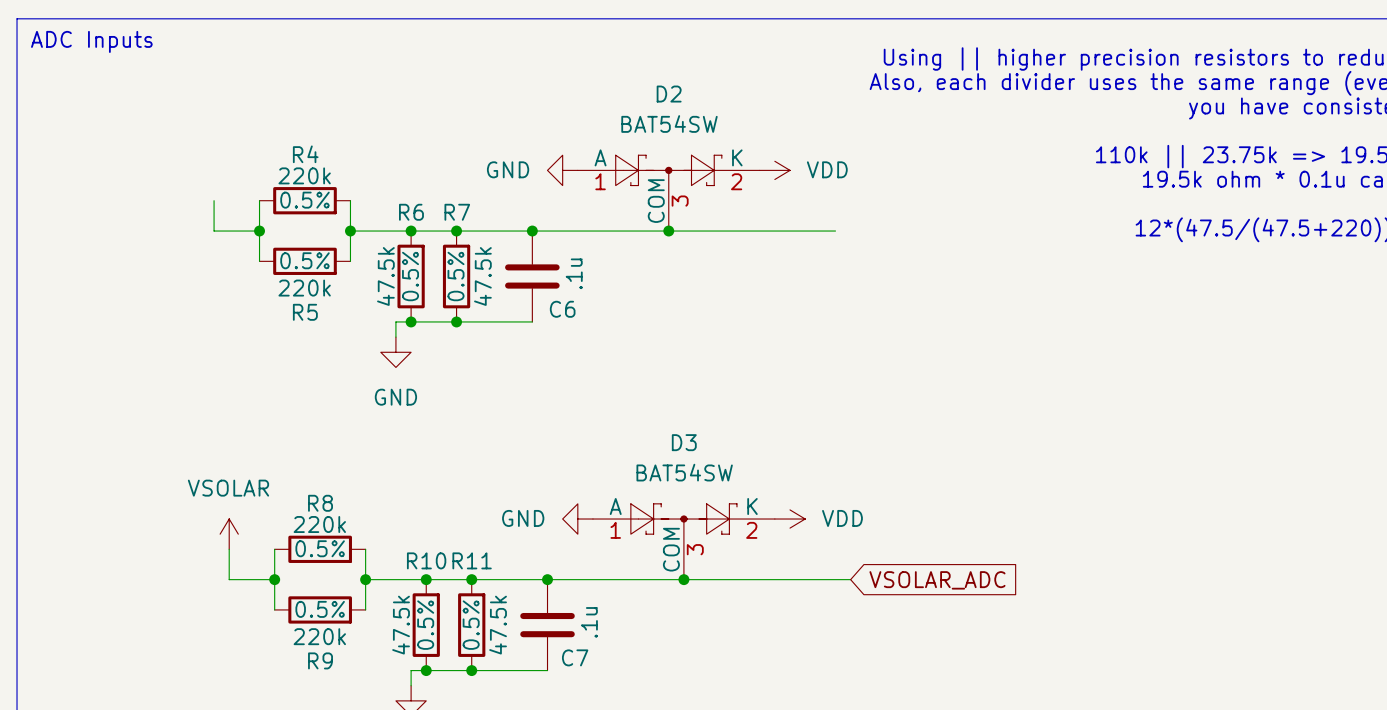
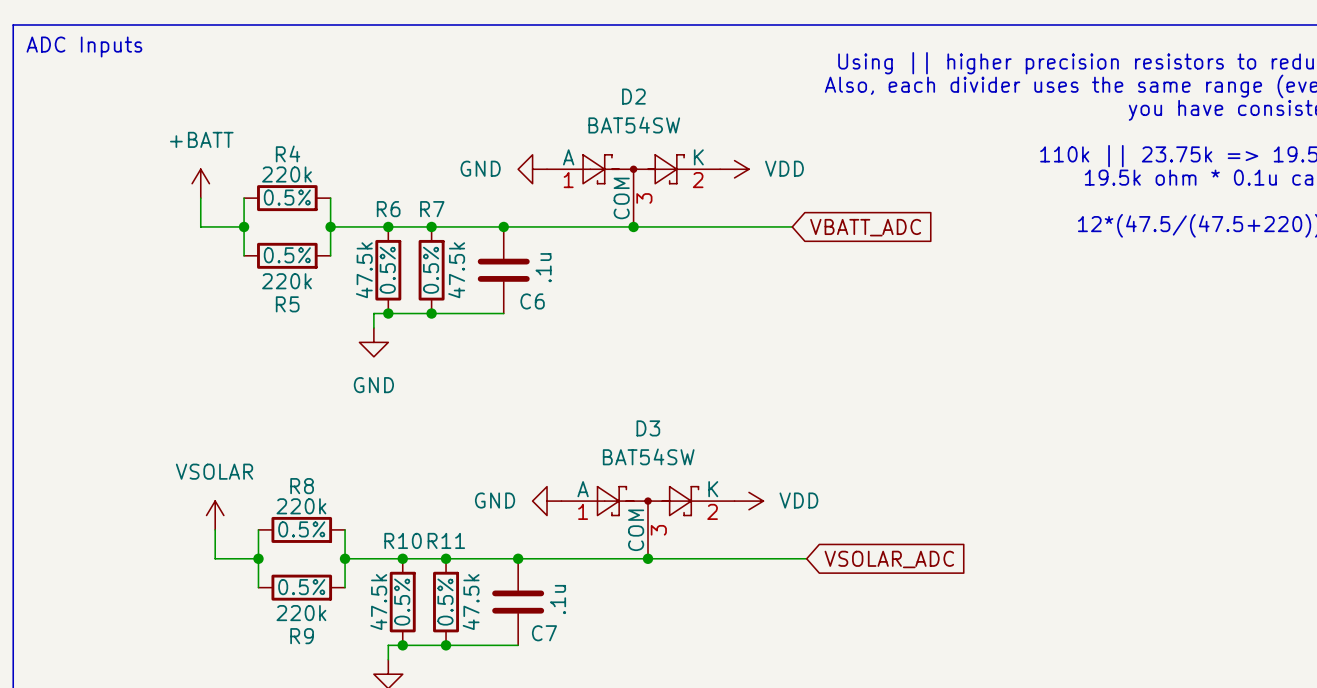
power symbol: none -> +BATT (200, 183)
global label: none -> VBATT_ADC (865, 227)

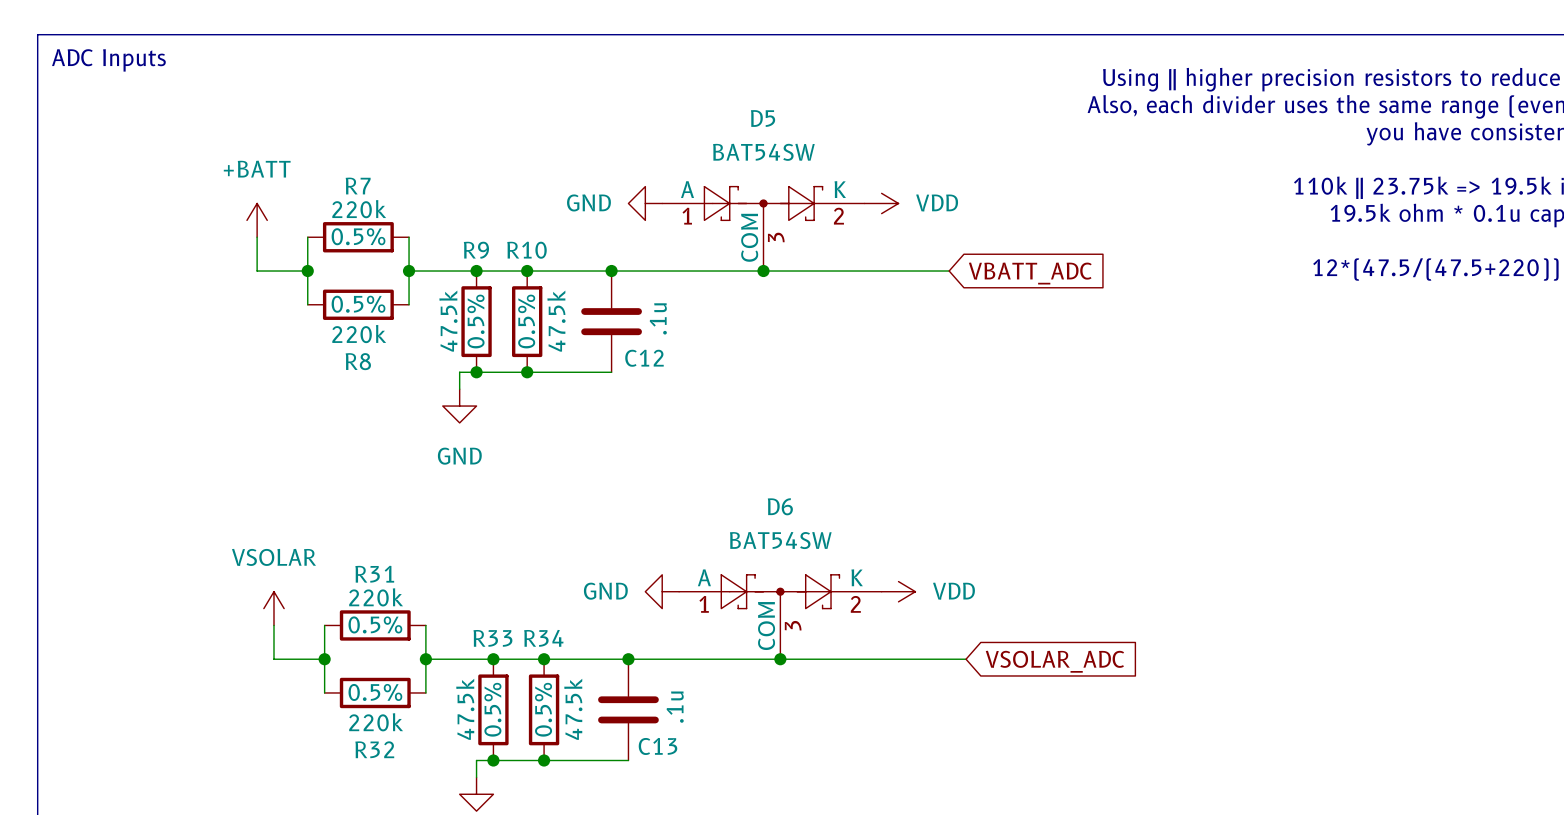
D2 name: D2 (633, 96) -> D5 (763, 118)
R4 name: R4 (288, 153) -> R7 (358, 186)
R6 name: R6 (388, 209) -> R9 (476, 250)
R7 name: R7 (432, 209) -> R10 (526, 250)
C6 name: C6 (532, 301) -> C12 (644, 358)
R5 name: R5 (287, 304) -> R8 (358, 361)
D3 name: D3 (648, 428) -> D6 (780, 506)
R8 name: R8 (302, 486) -> R31 (374, 574)
R10 name: R10 (403, 540) -> R33 (492, 638)
R11 name: R11 (446, 540) -> R34 (543, 638)
C7 name: C7 (544, 633) -> C13 (657, 746)
R9 name: R9 (302, 636) -> R32 (374, 749)

